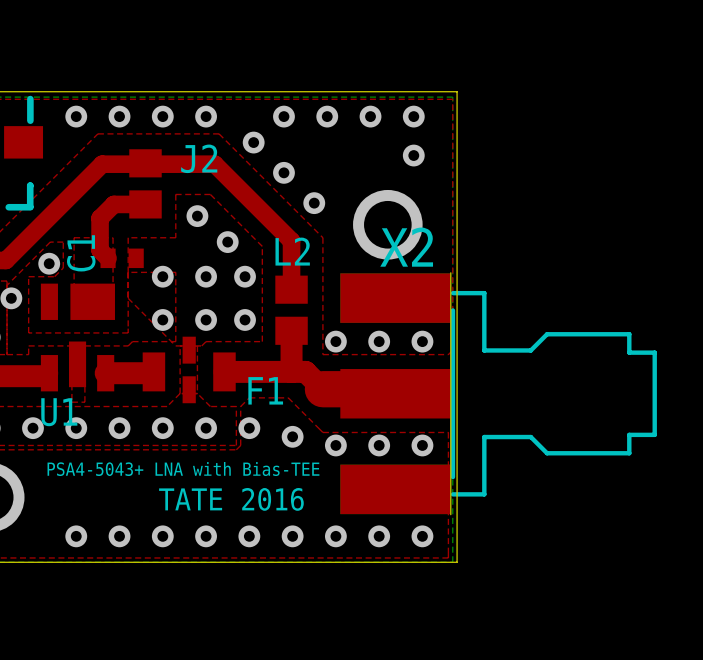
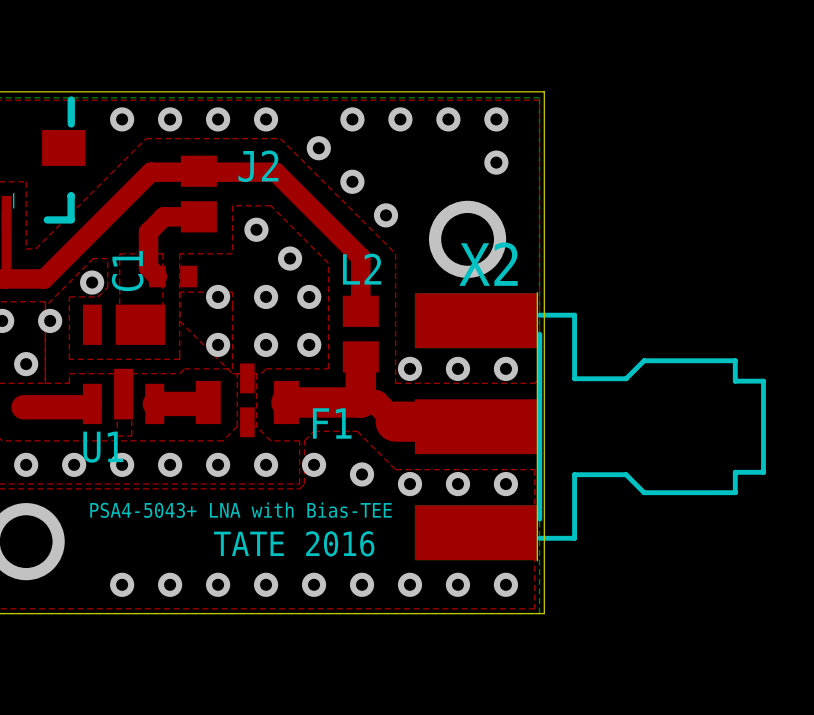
top track width: thin (291, 330) (291, 371) (224, 371) -> thick (360, 356) (360, 402) (286, 402)

